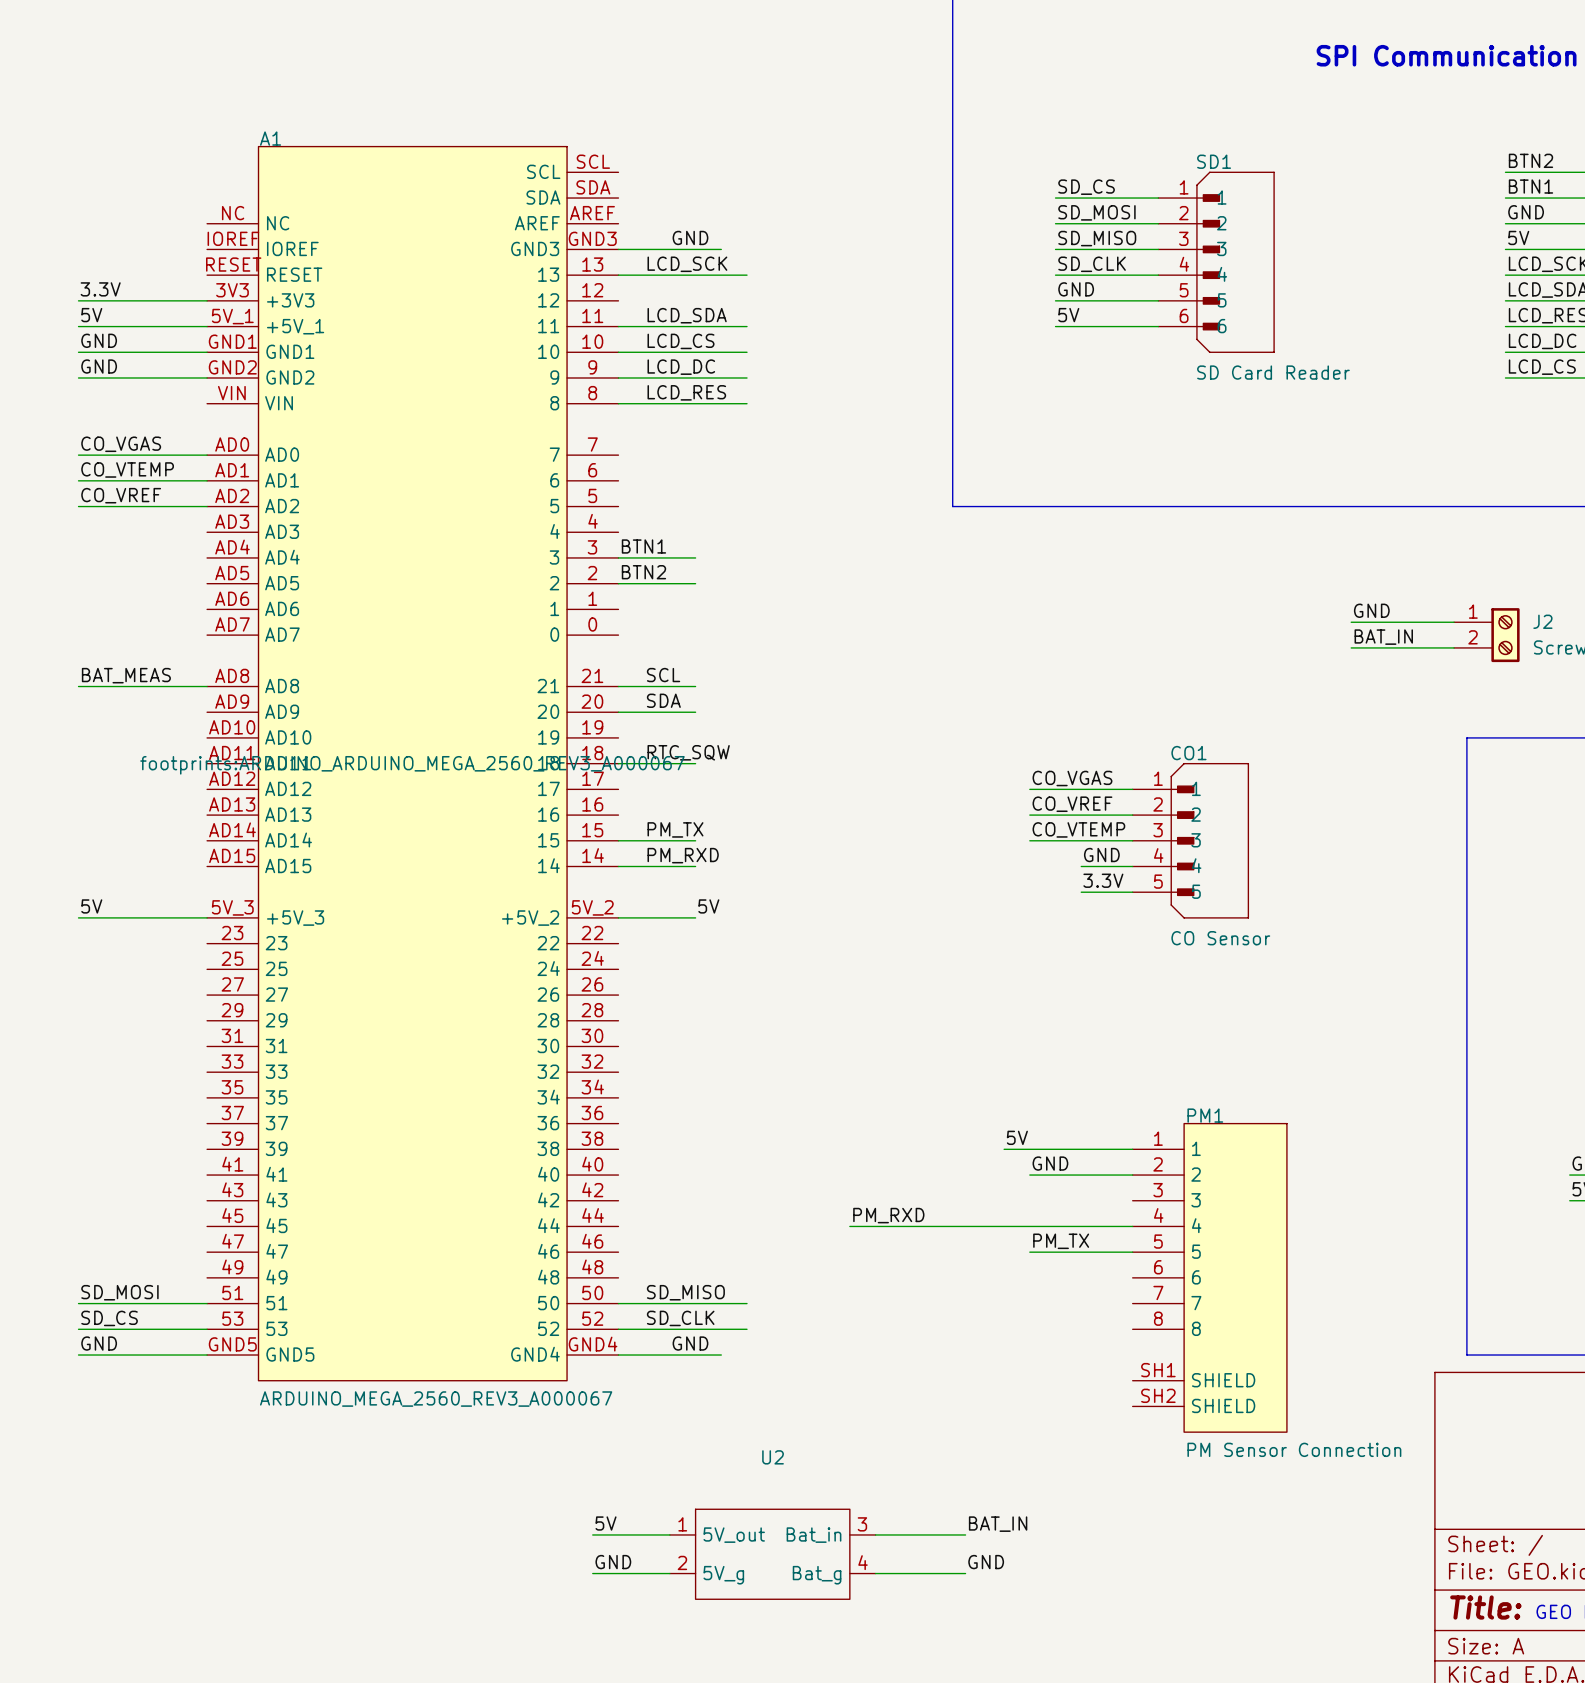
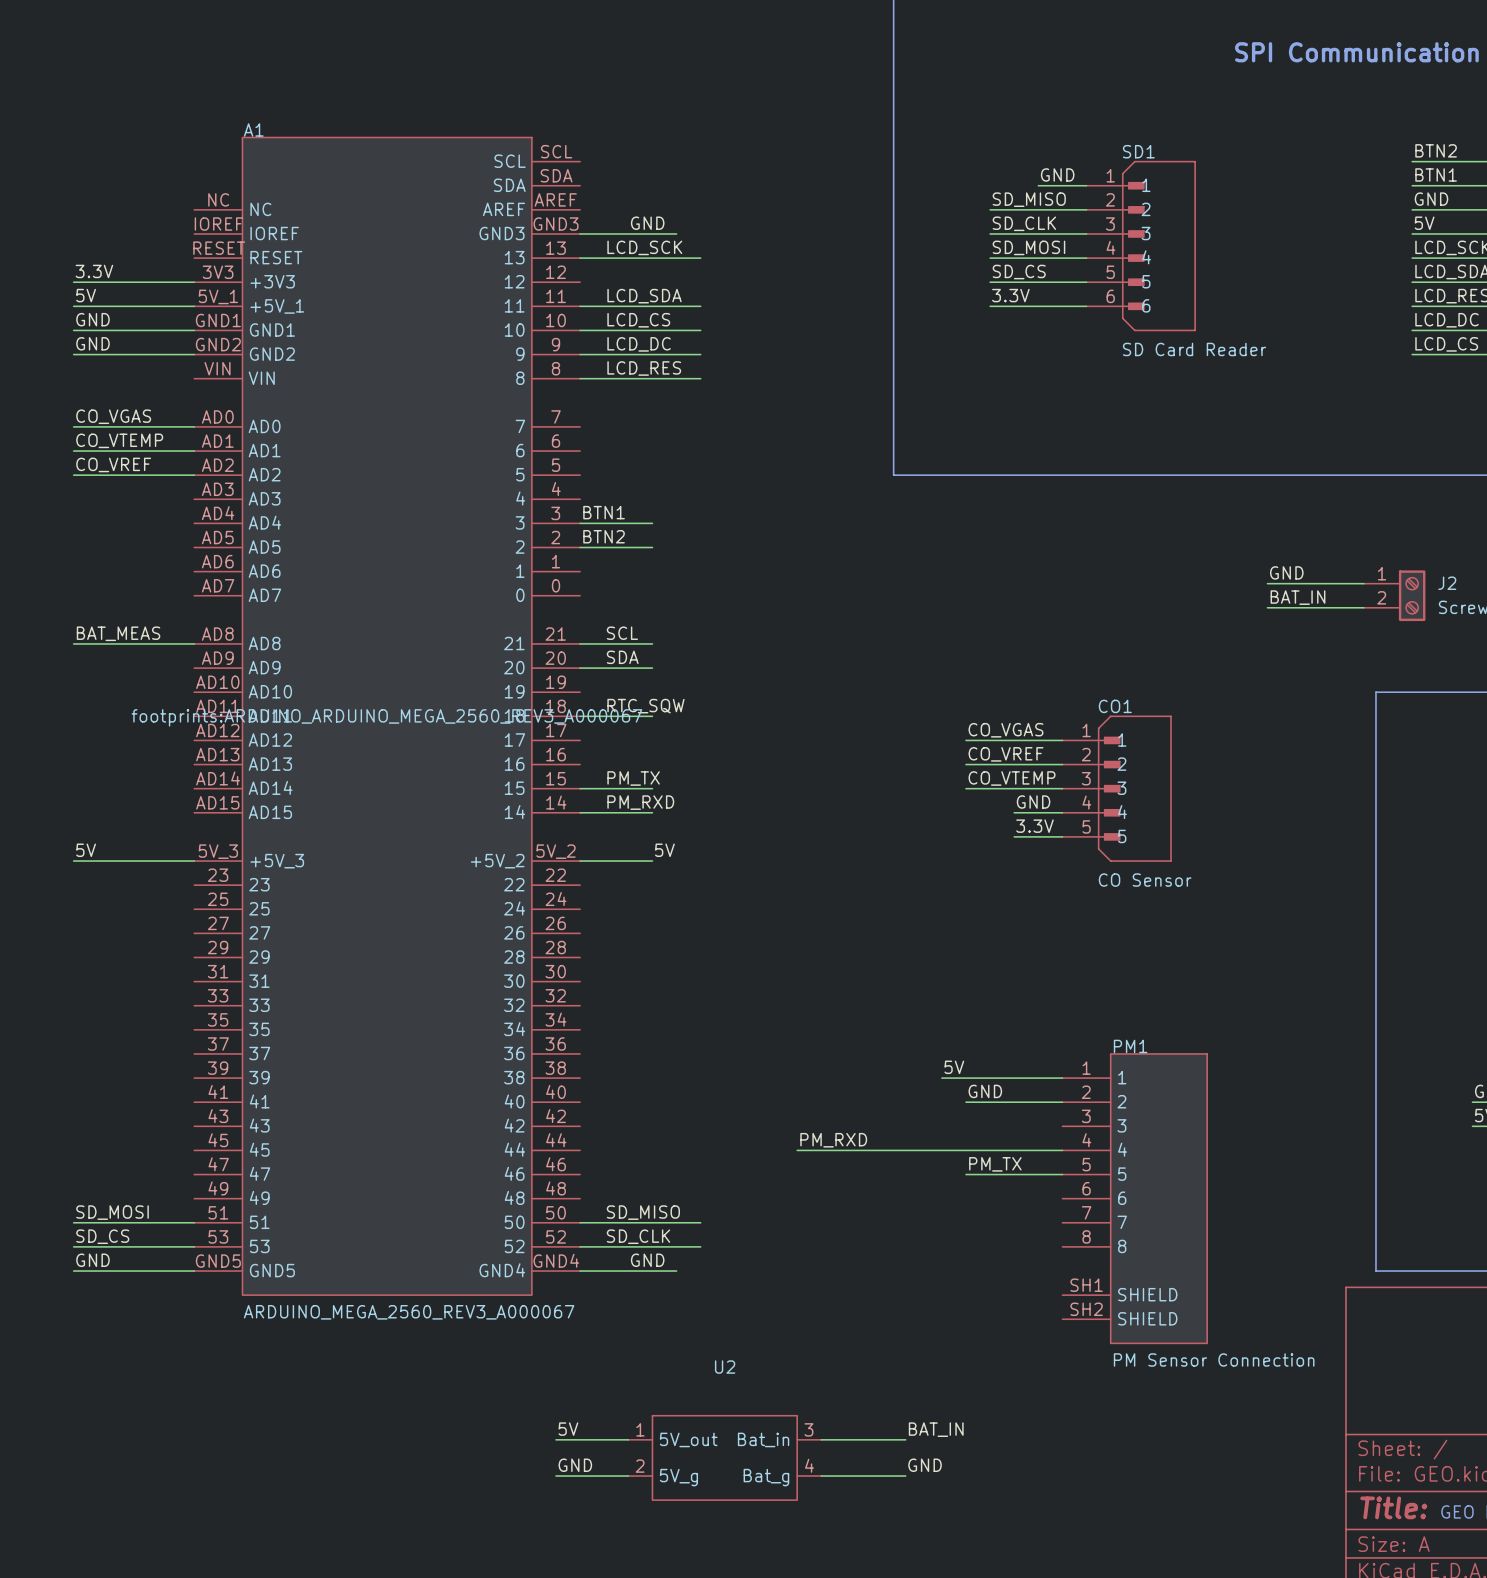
label: none -> GND (1057, 174)
label: SD_CS (1086, 187) -> none
wire: (1055, 198) (1106, 198) -> none
label: SD_MOSI (1096, 212) -> SD_MISO (1029, 199)
label: SD_MISO (1097, 238) -> SD_CLK (1024, 223)
label: SD_CLK (1092, 264) -> SD_MOSI (1028, 247)
label: GND (1076, 289) -> SD_CS (1019, 272)
label: 5V (1068, 315) -> 3.3V (1010, 295)

